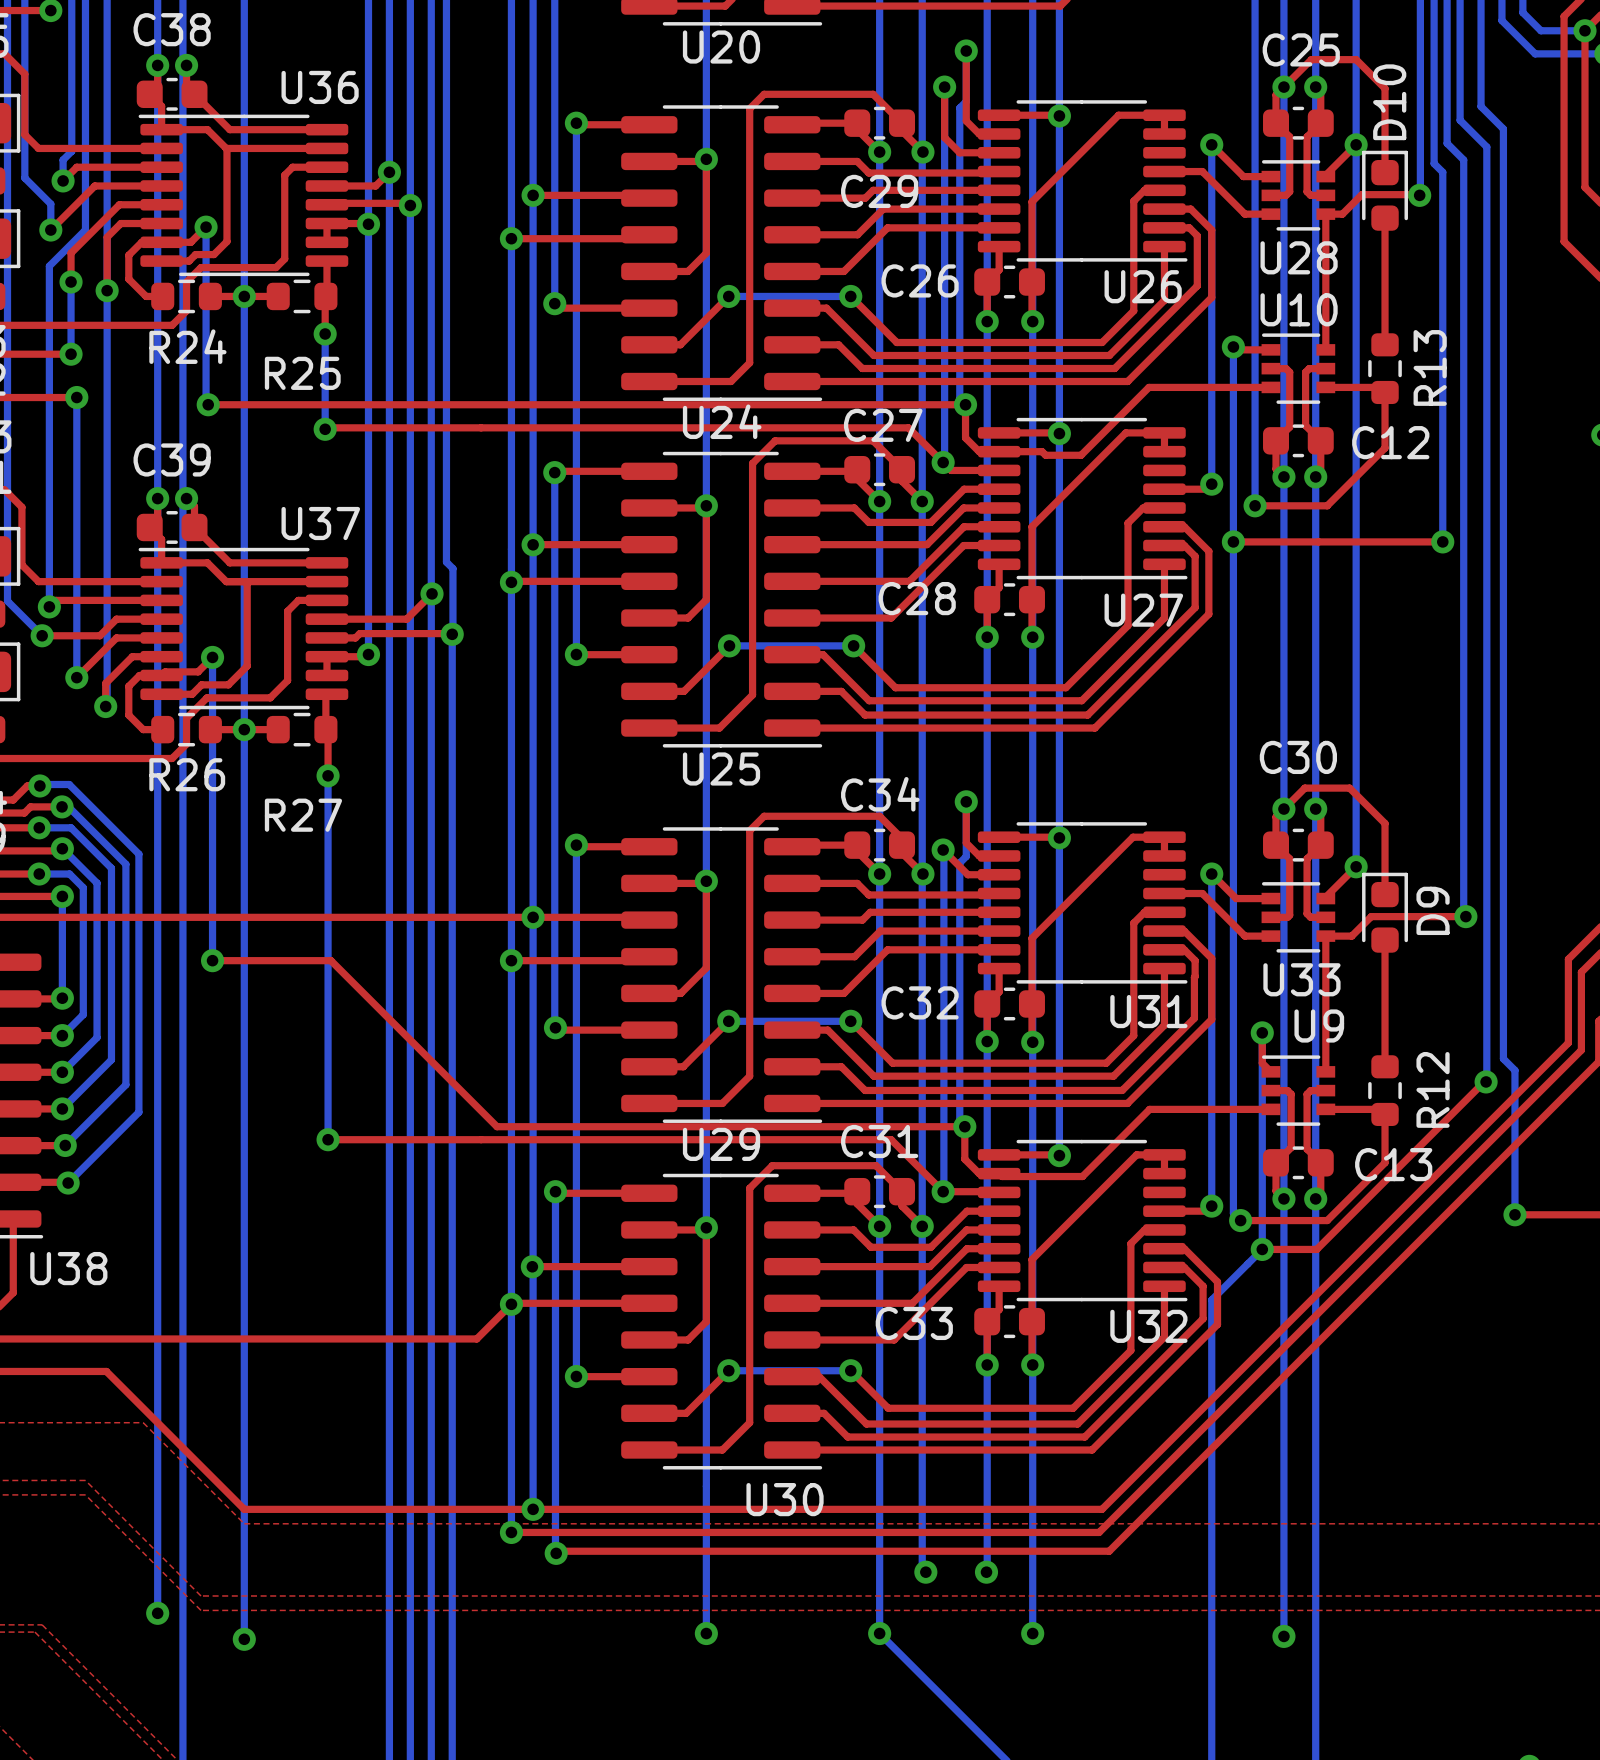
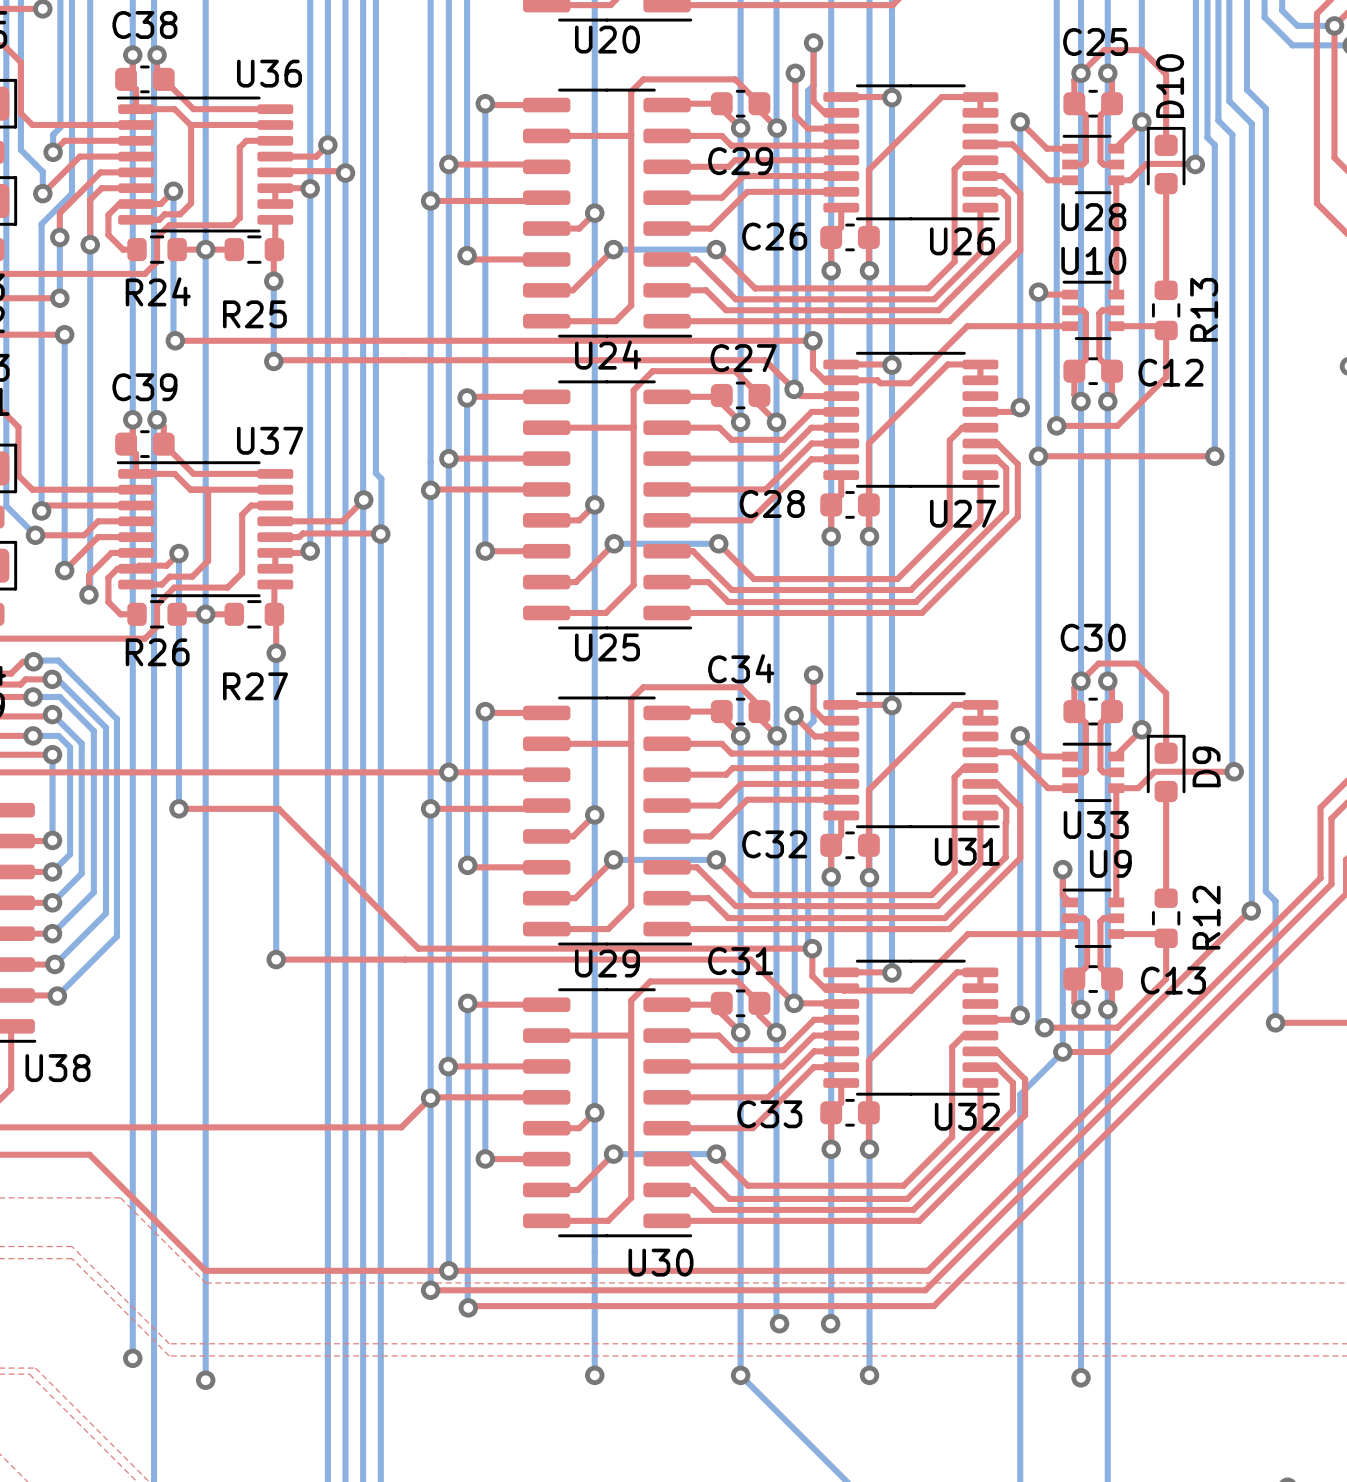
via position: (706, 159) -> (594, 213)
top track: (704, 161) (706, 159) (706, 253) -> (592, 135) (631, 135)
via position: (706, 505) -> (594, 504)
top track: (704, 507) (706, 505) (706, 599) -> (592, 427) (633, 427)
via position: (706, 881) -> (594, 814)
top track: (704, 883) (706, 881) (706, 967) -> (592, 743) (631, 743)
via position: (706, 1227) -> (594, 1112)
top track: (704, 1229) (706, 1227) (706, 1321) -> (592, 1035) (631, 1034)

